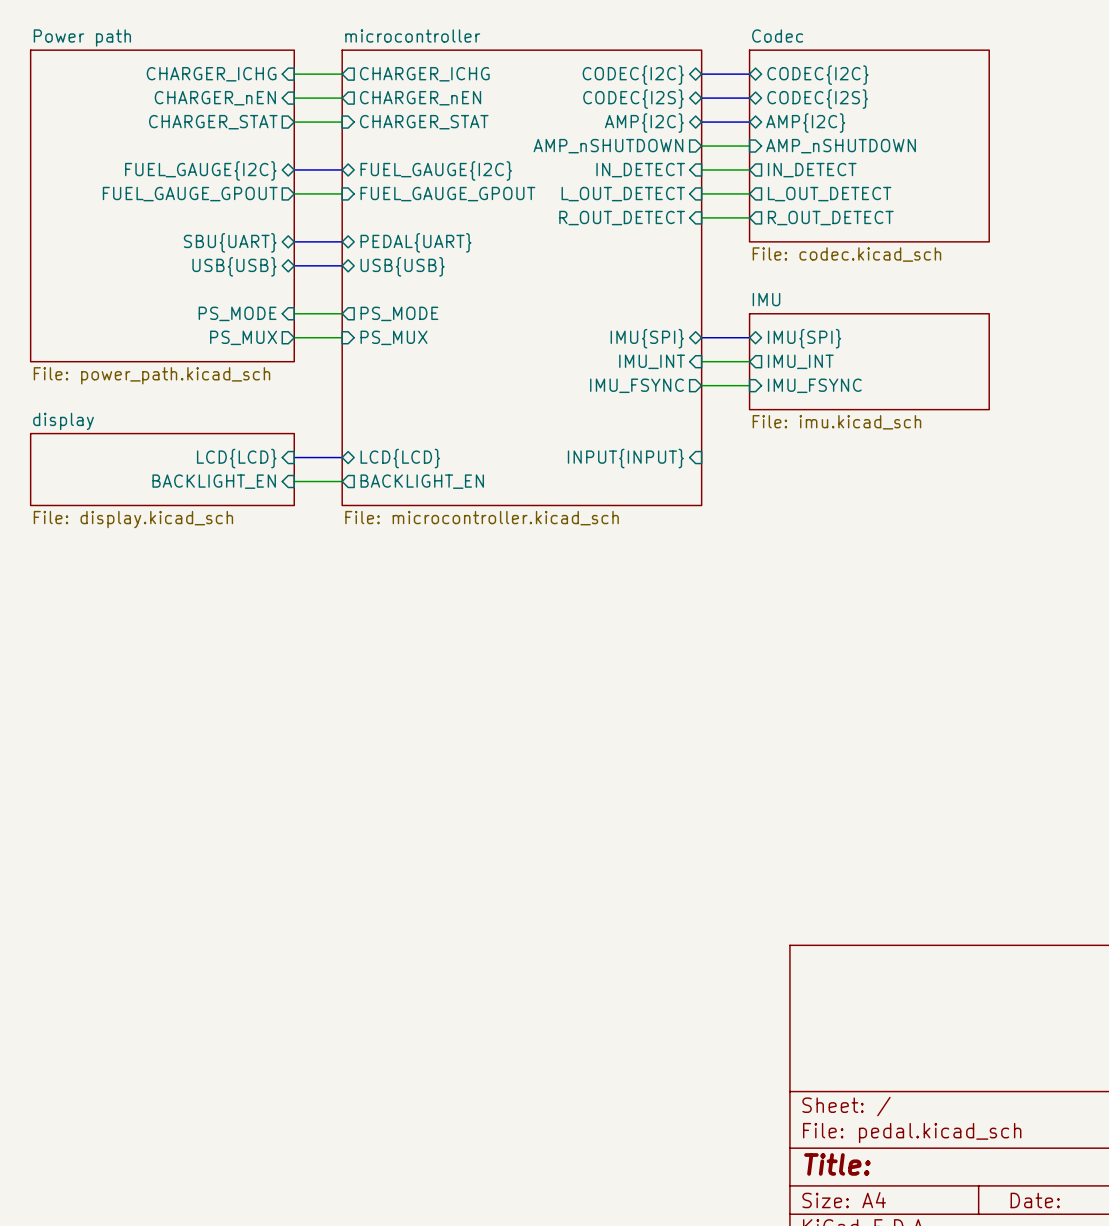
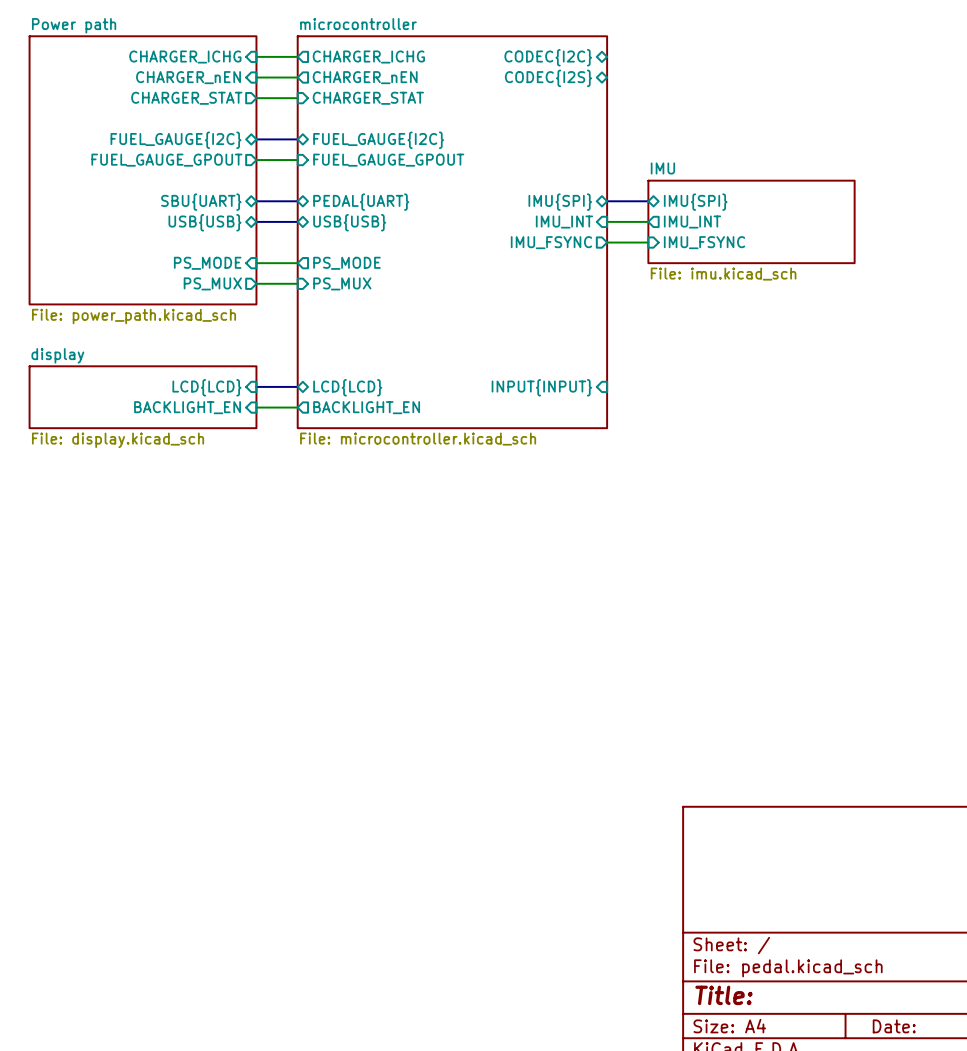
bus: (701, 74) (749, 74) -> none
sheet pin: CODEC{I2C} (817, 75) -> none
bus: (701, 98) (749, 98) -> none
sheet pin: CODEC{I2S} (817, 99) -> none
bus: (701, 122) (749, 122) -> none
sheet pin: AMP{I2C} (644, 123) -> none
sheet pin: AMP{I2C} (805, 123) -> none
sheet pin: AMP_nSHUTDOWN (608, 146) -> none
wire: (701, 146) (749, 146) -> none
sheet pin: AMP_nSHUTDOWN (841, 146) -> none
sheet Codec: File: codec.kicad_sch (869, 146) -> none
wire: (701, 169) (749, 169) -> none
sheet pin: IN_DETECT (640, 170) -> none
sheet pin: IN_DETECT (812, 170) -> none
wire: (701, 193) (749, 193) -> (607, 221) (648, 221)
sheet pin: L_OUT_DETECT (623, 194) -> none
sheet pin: L_OUT_DETECT (829, 194) -> none
wire: (701, 217) (749, 217) -> (607, 242) (648, 242)
sheet pin: R_OUT_DETECT (622, 218) -> none
sheet pin: R_OUT_DETECT (830, 218) -> none
sheet pin: none -> IMU{SPI} (560, 202)
sheet pin: none -> IMU{SPI} (695, 202)
sheet pin: none -> IMU_INT (564, 222)
sheet pin: none -> IMU_INT (692, 222)
sheet pin: none -> IMU_FSYNC (551, 242)
sheet pin: none -> IMU_FSYNC (704, 242)
bus: (701, 337) (749, 337) -> (607, 201) (648, 201)
sheet pin: IMU{SPI} (647, 338) -> none
sheet pin: IMU{SPI} (804, 338) -> none
sheet pin: IMU_INT (652, 361) -> none
wire: (701, 361) (749, 361) -> none
sheet pin: IMU_INT (800, 361) -> none
sheet IMU position: (869, 361) -> (751, 221)
sheet pin: IMU_FSYNC (636, 385) -> none
wire: (701, 385) (749, 385) -> none
sheet pin: IMU_FSYNC (814, 385) -> none

